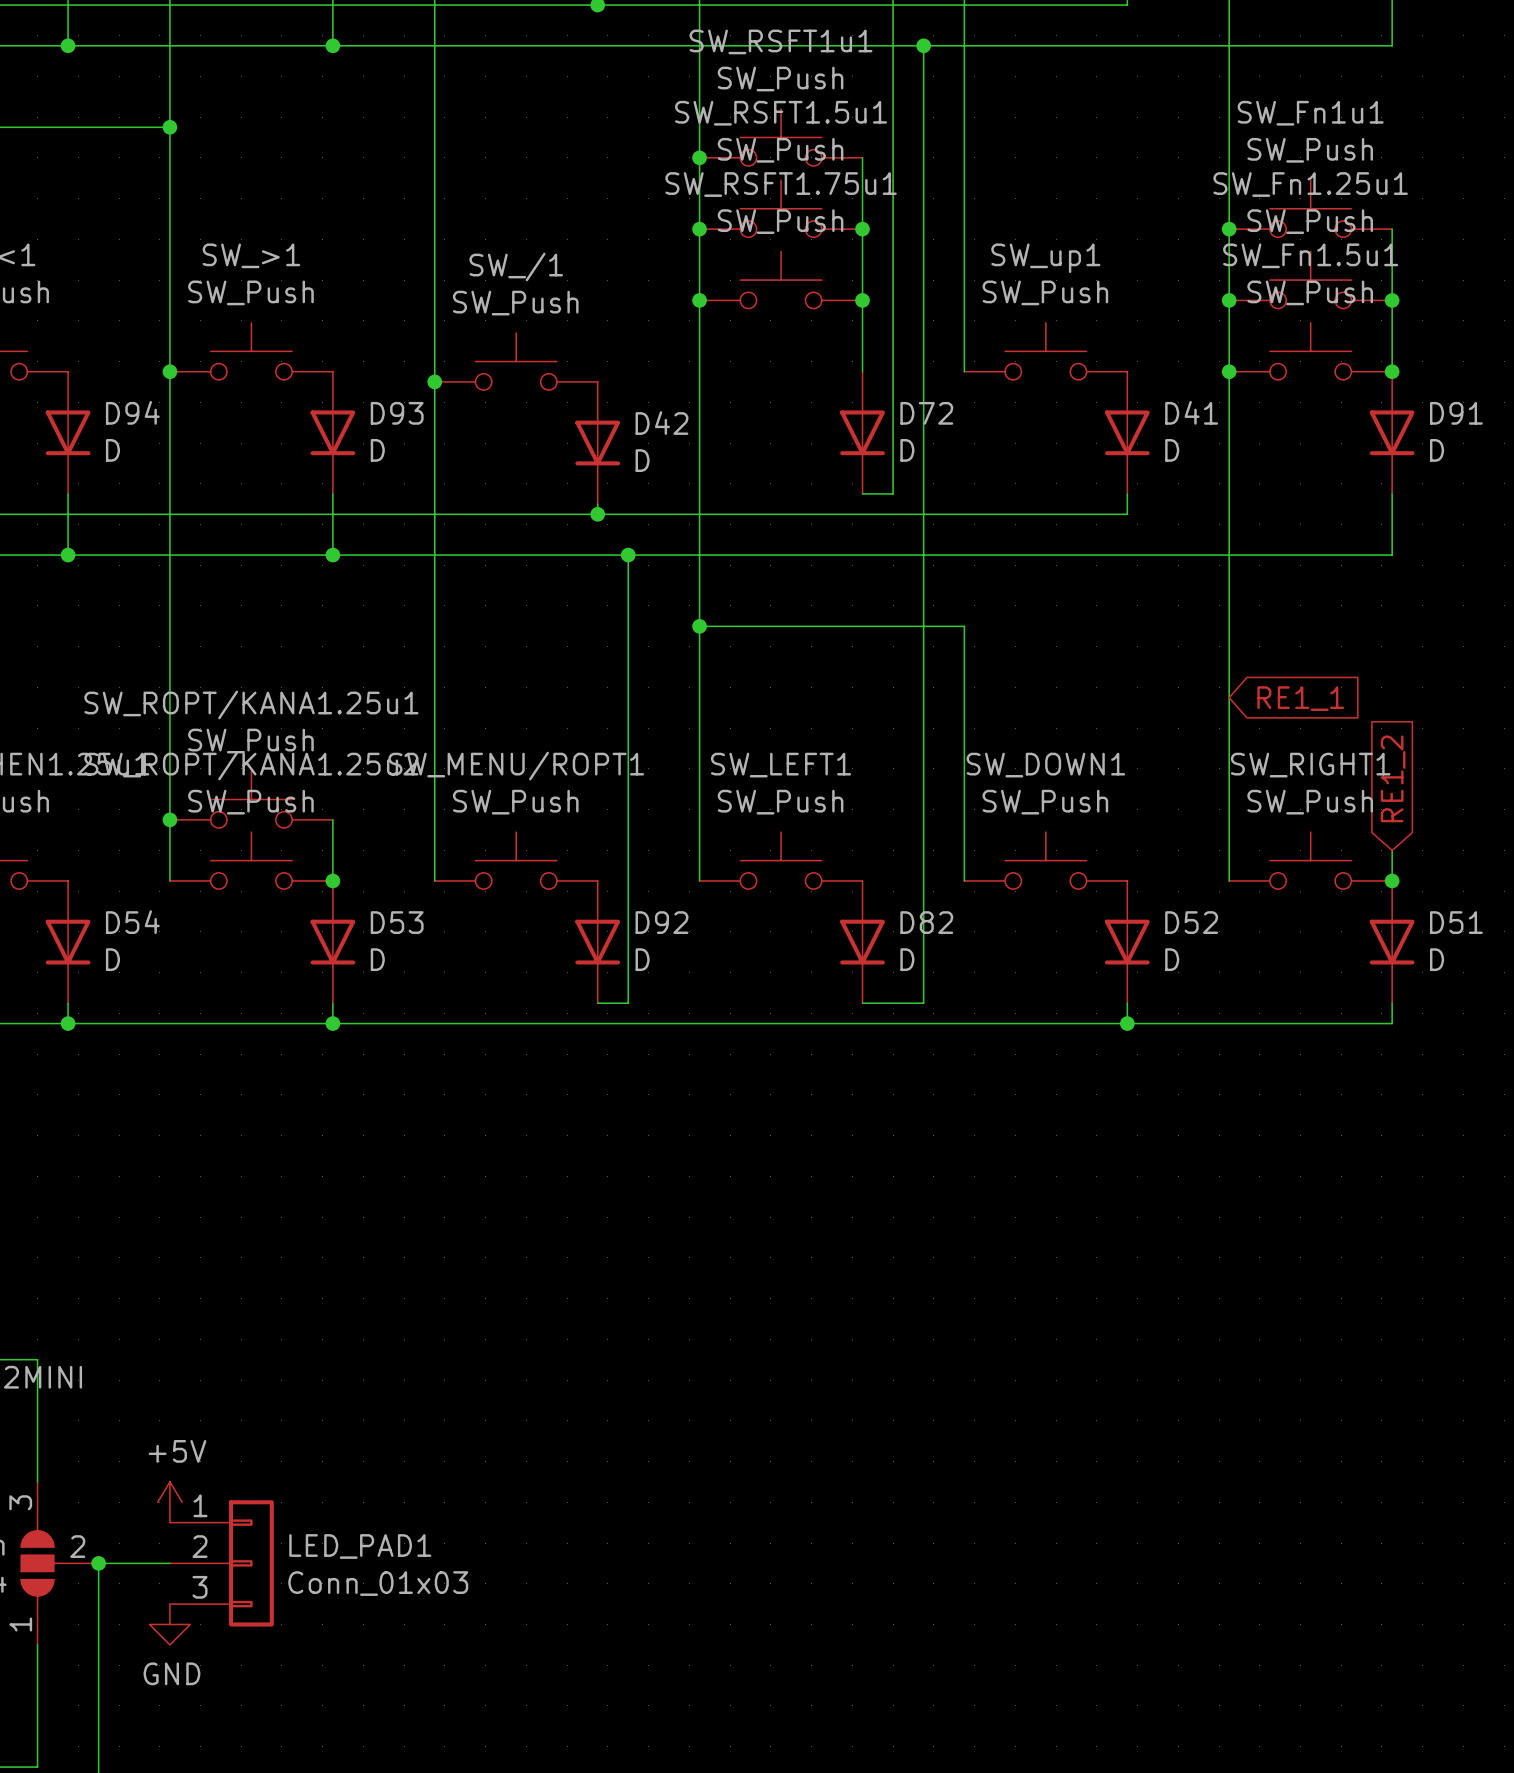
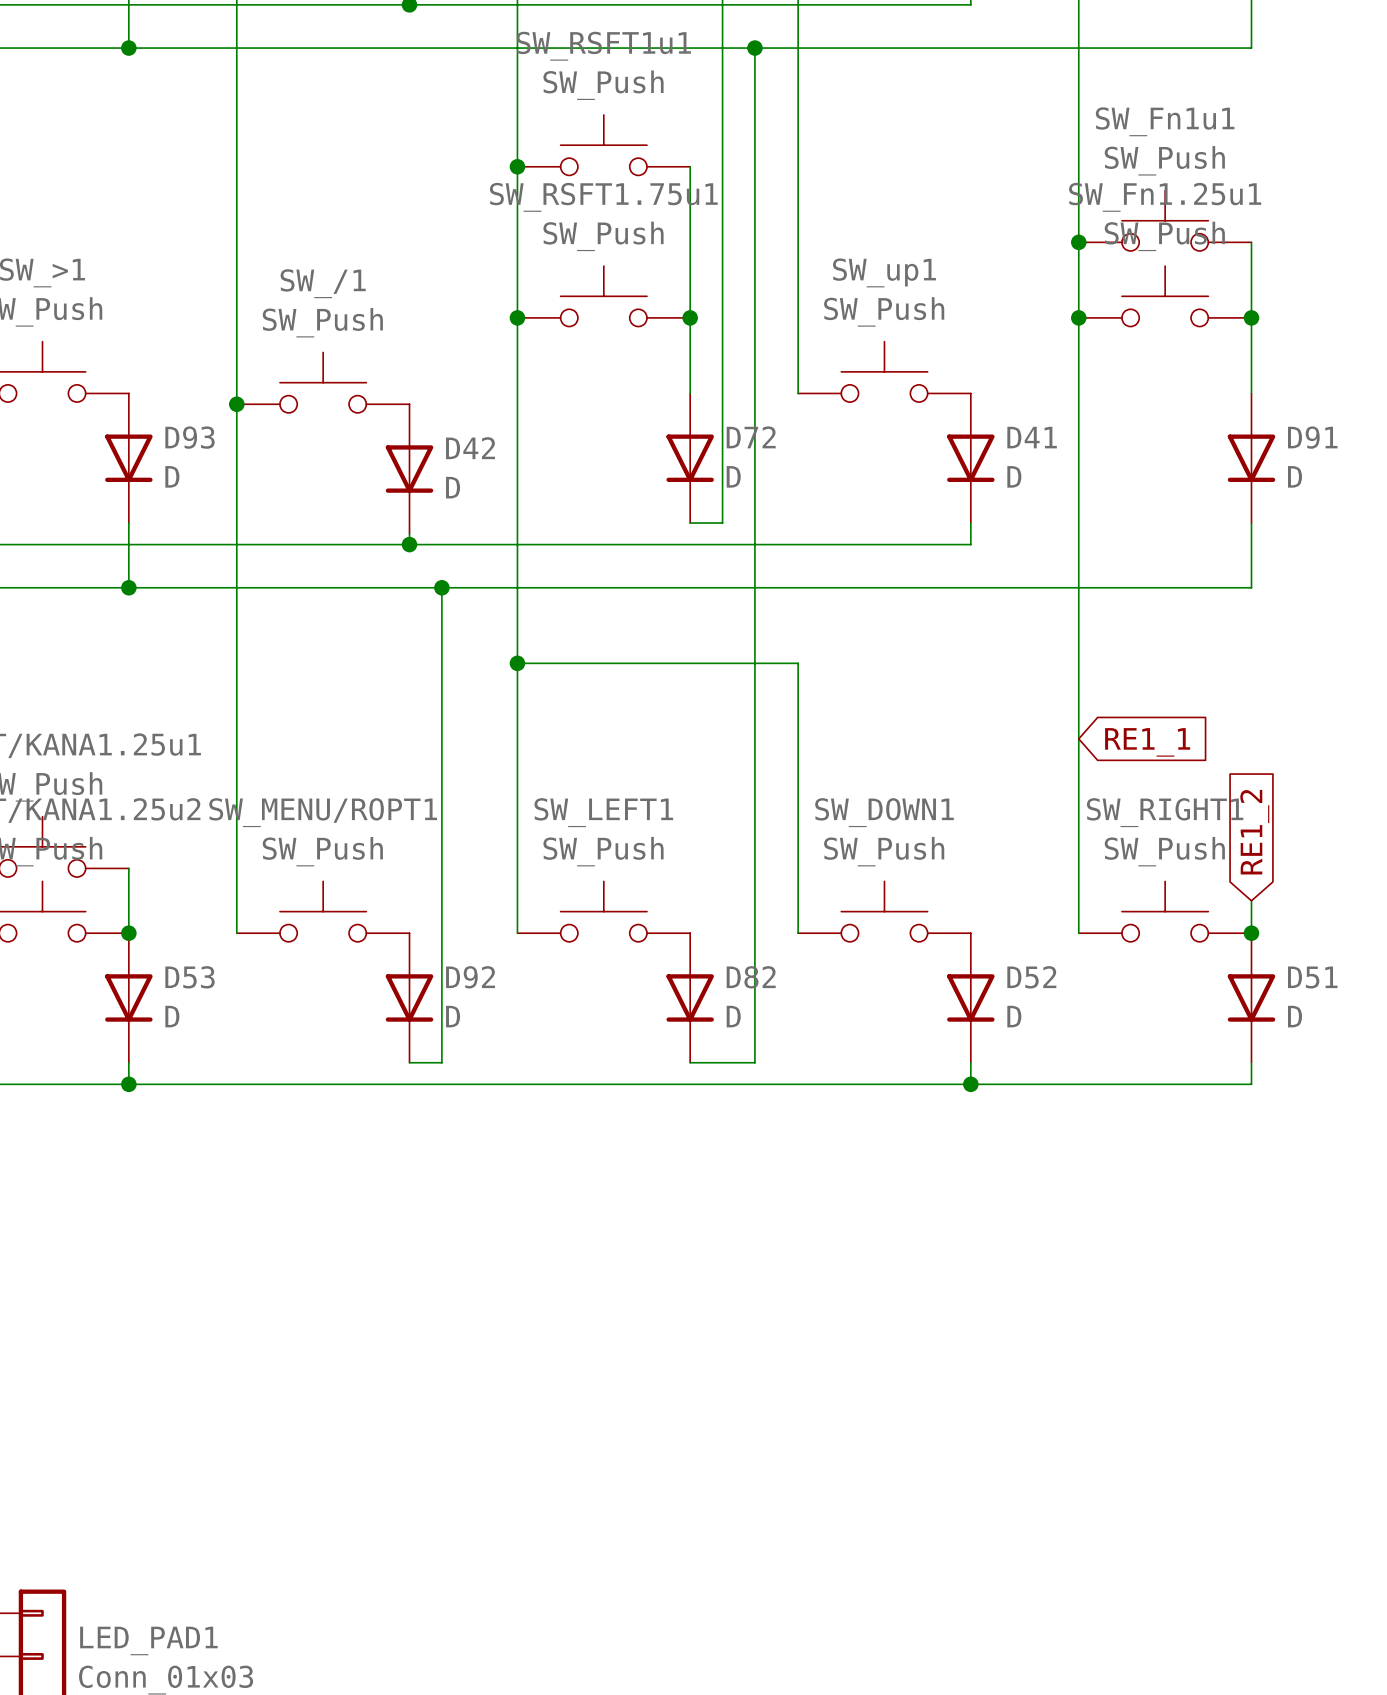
SW_RSFT1.5u1: SW_Push (781, 208) -> none
junction: (699, 229) -> none
junction: (862, 229) -> none
SW_Fn1.5u1: SW_Push (1310, 351) -> none
junction: (1229, 371) -> none
junction: (1392, 371) -> none

